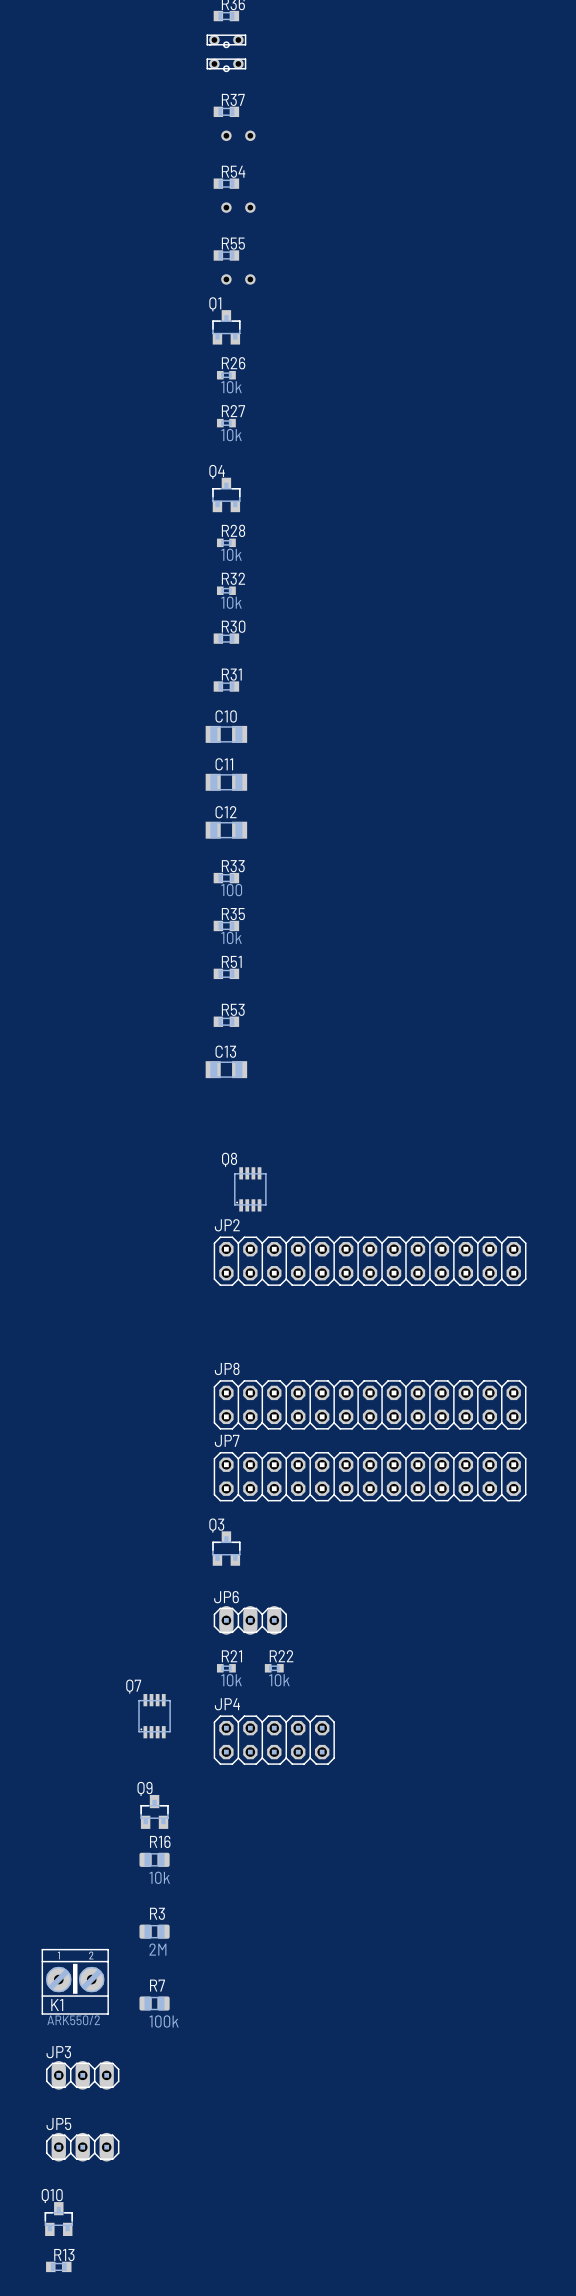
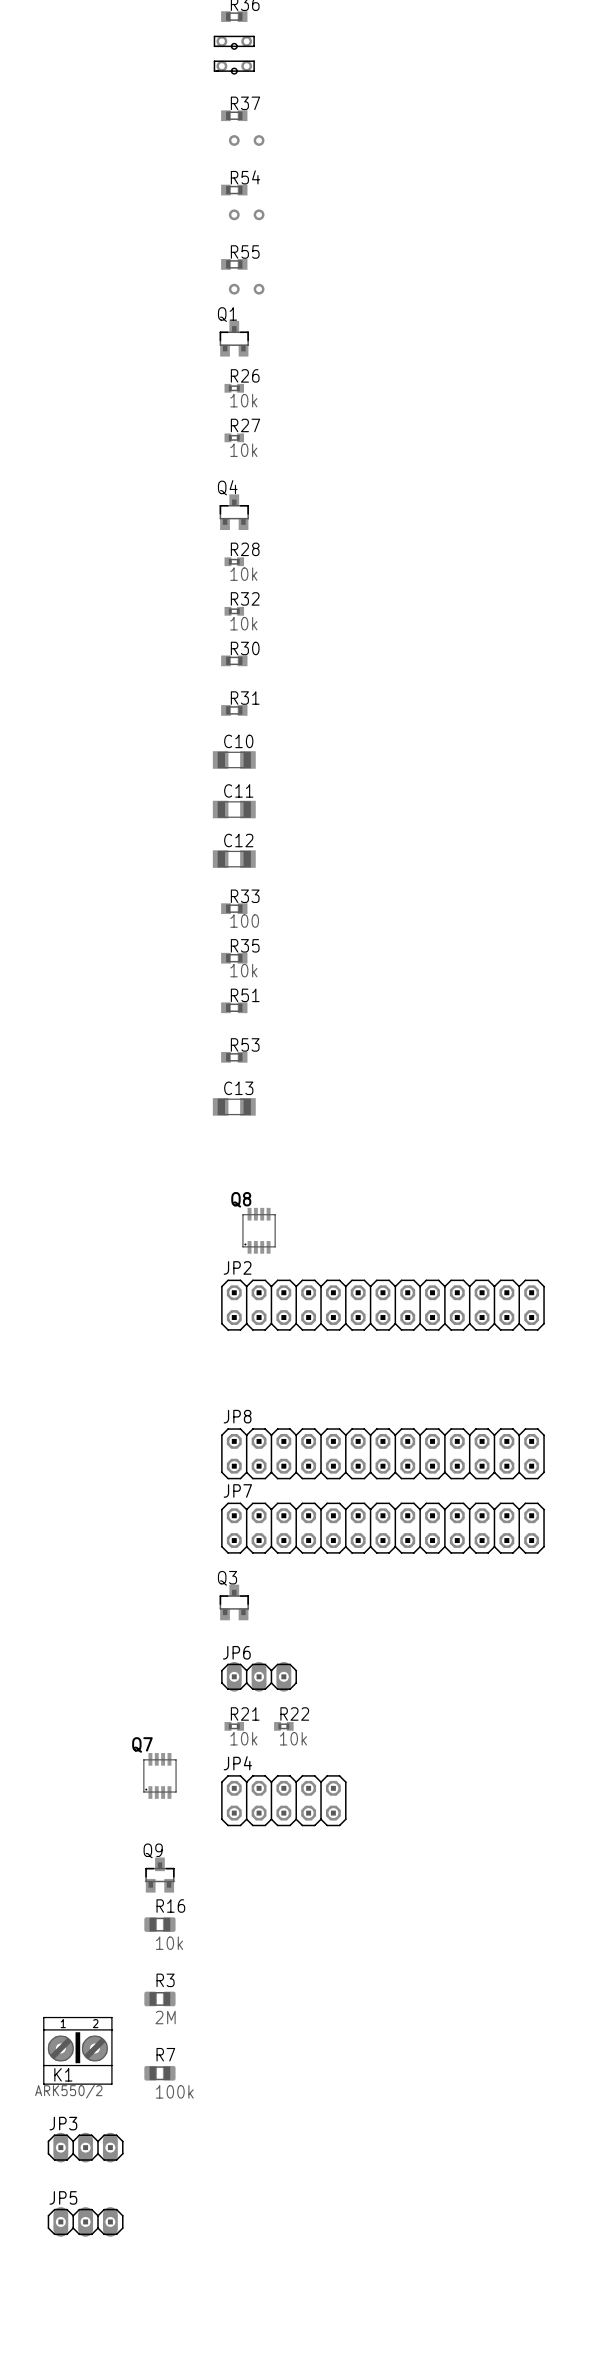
Q10: (58, 2219) -> none
R13: (58, 2266) -> none

